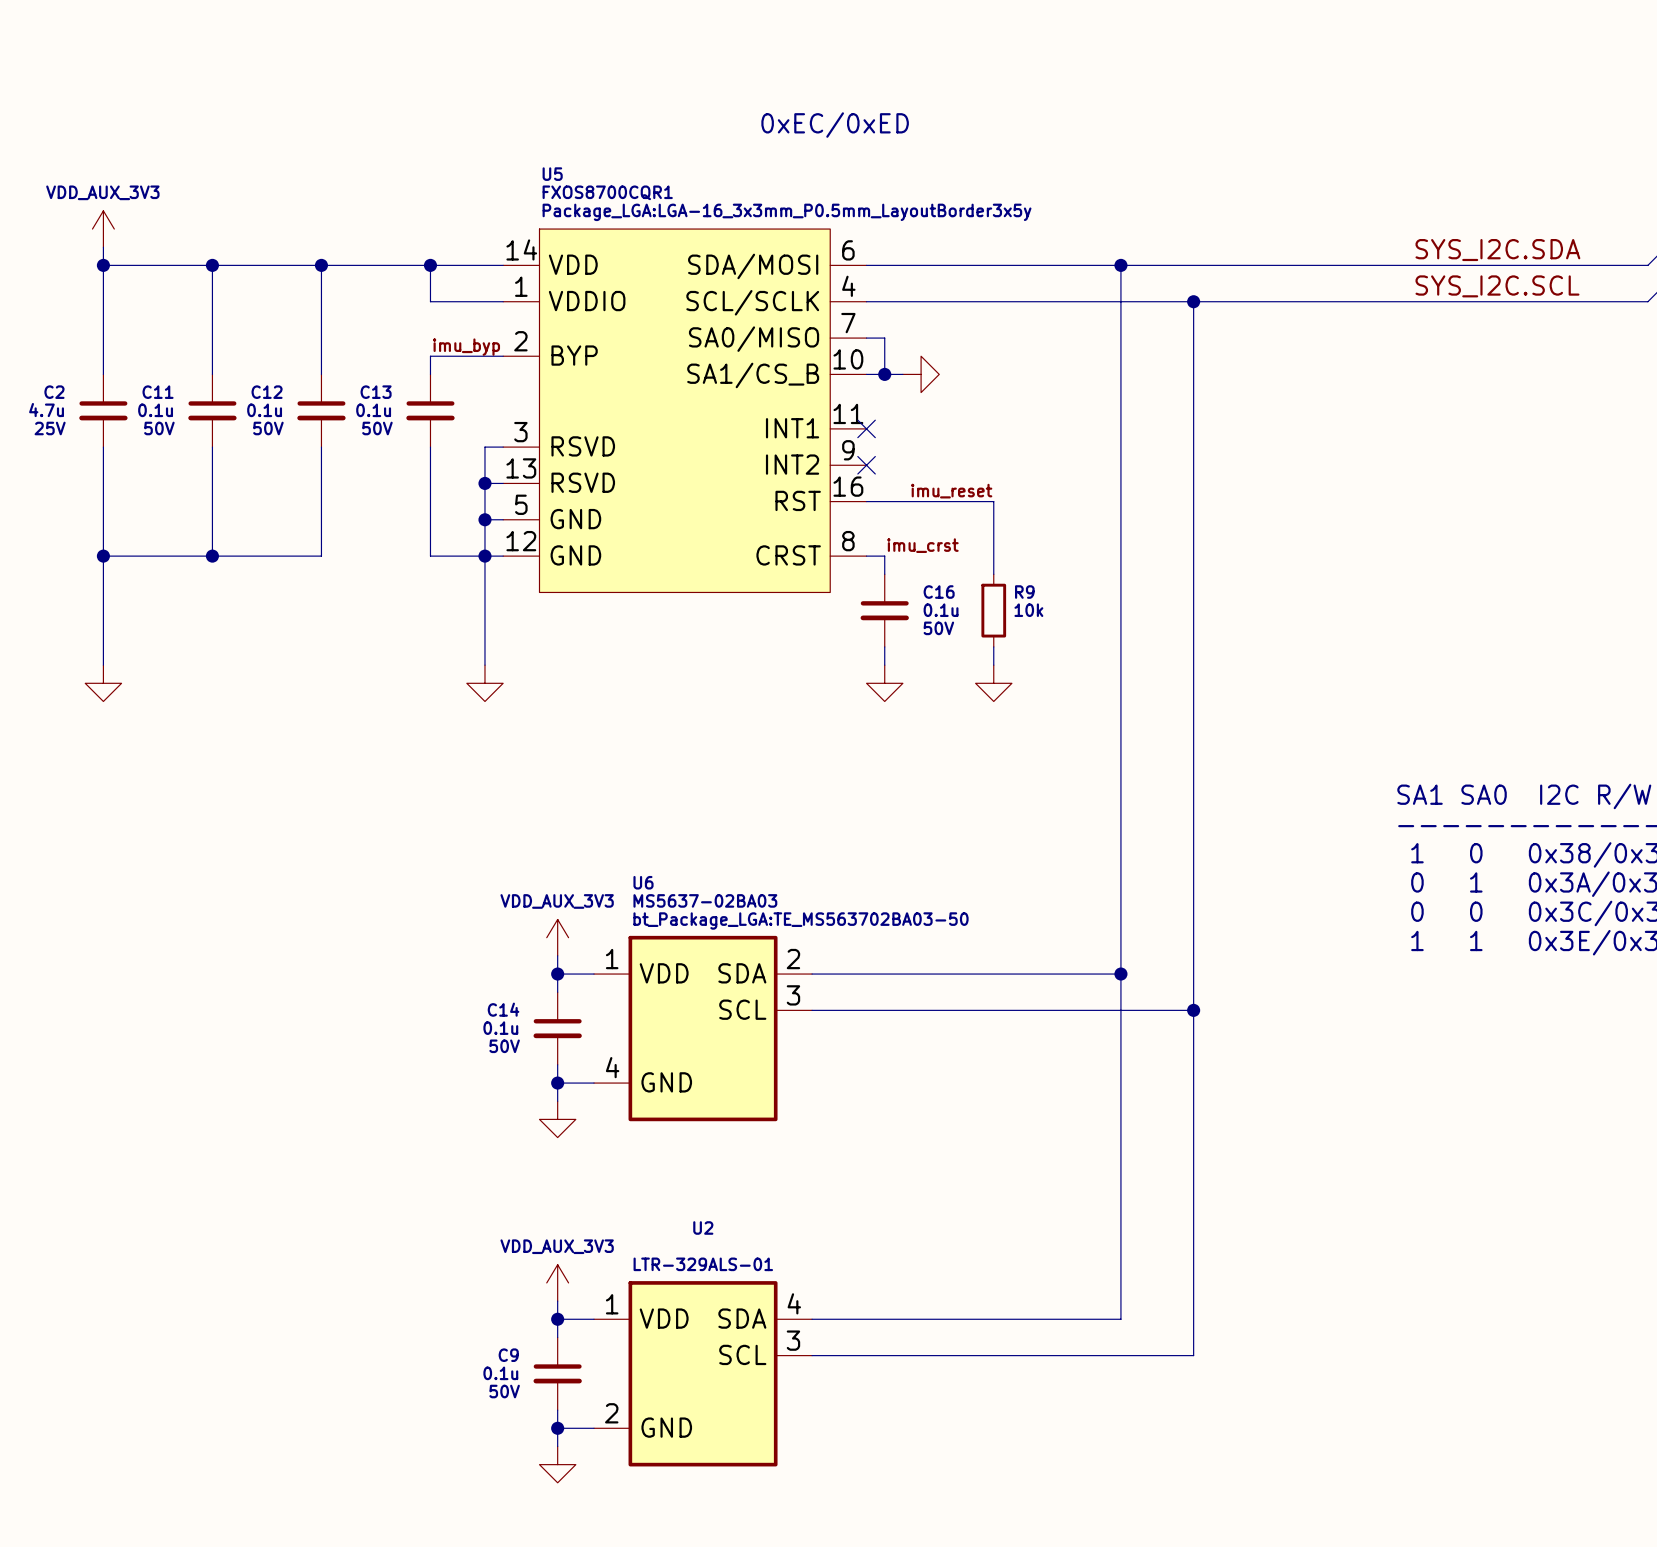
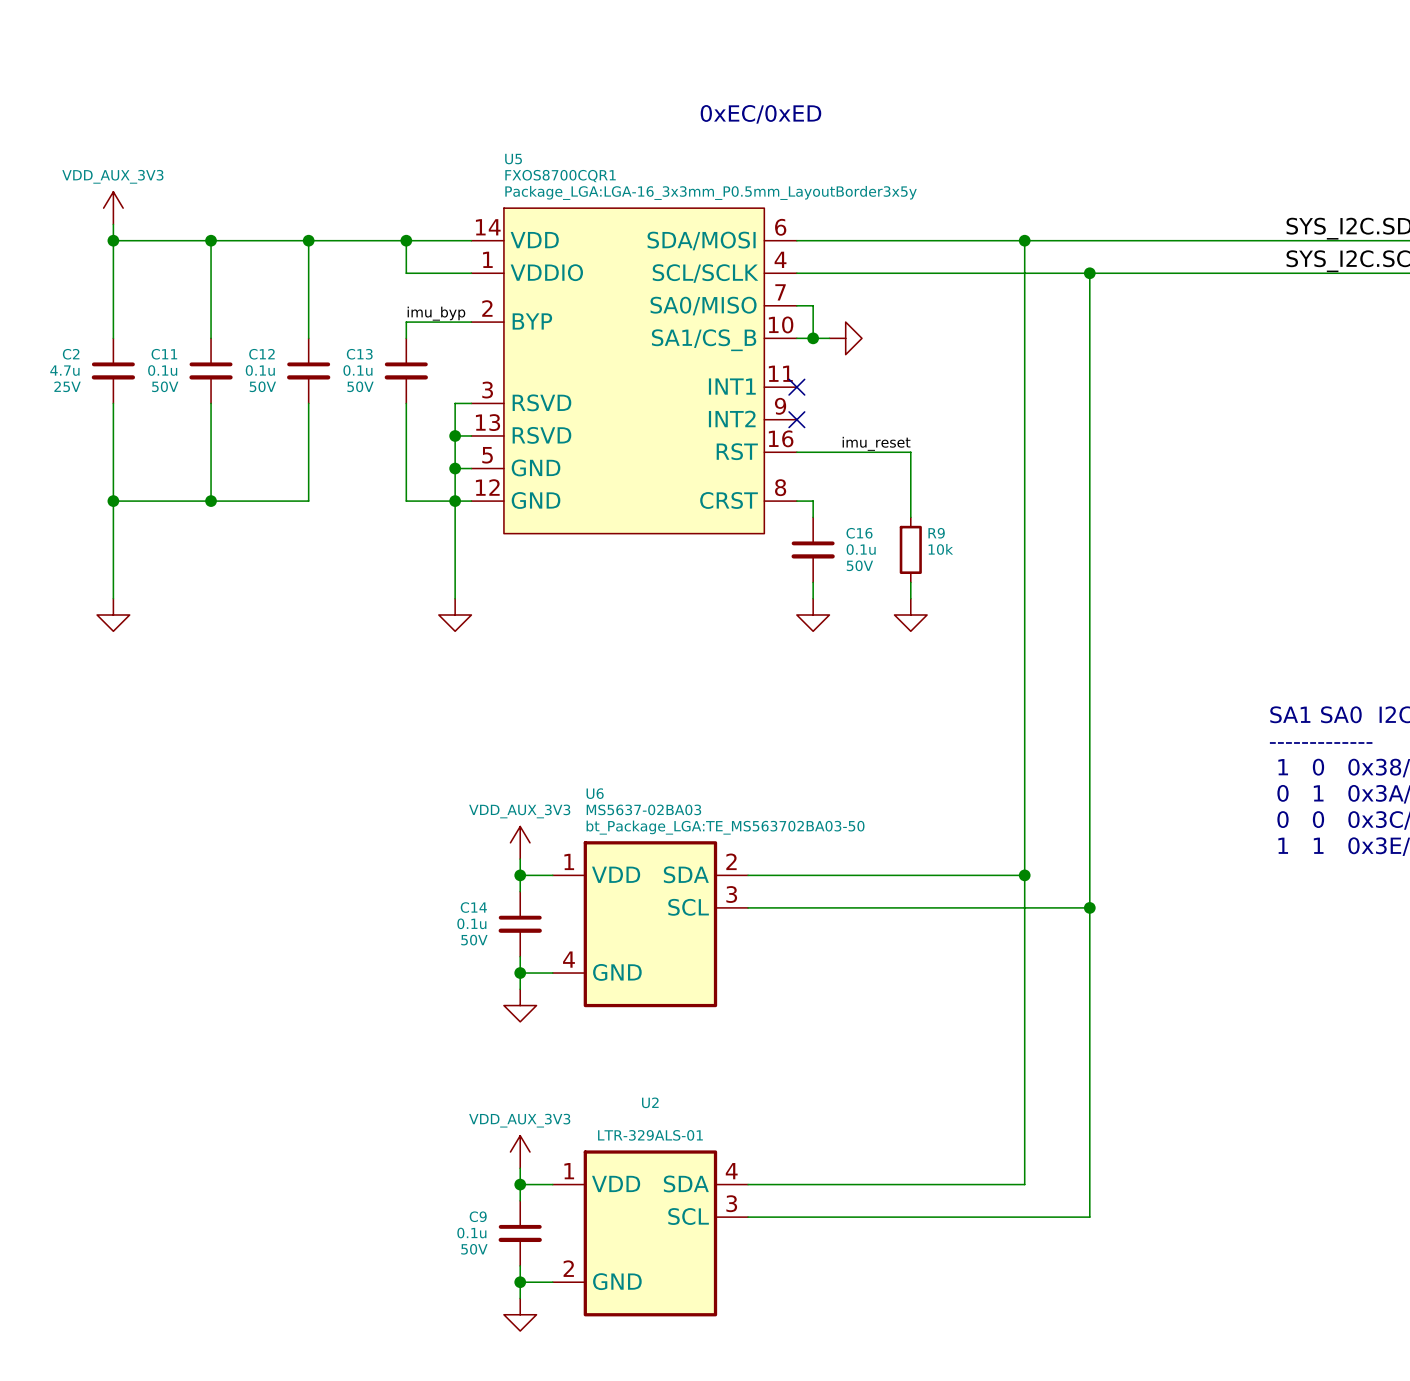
label: imu_crst (922, 545) -> none

